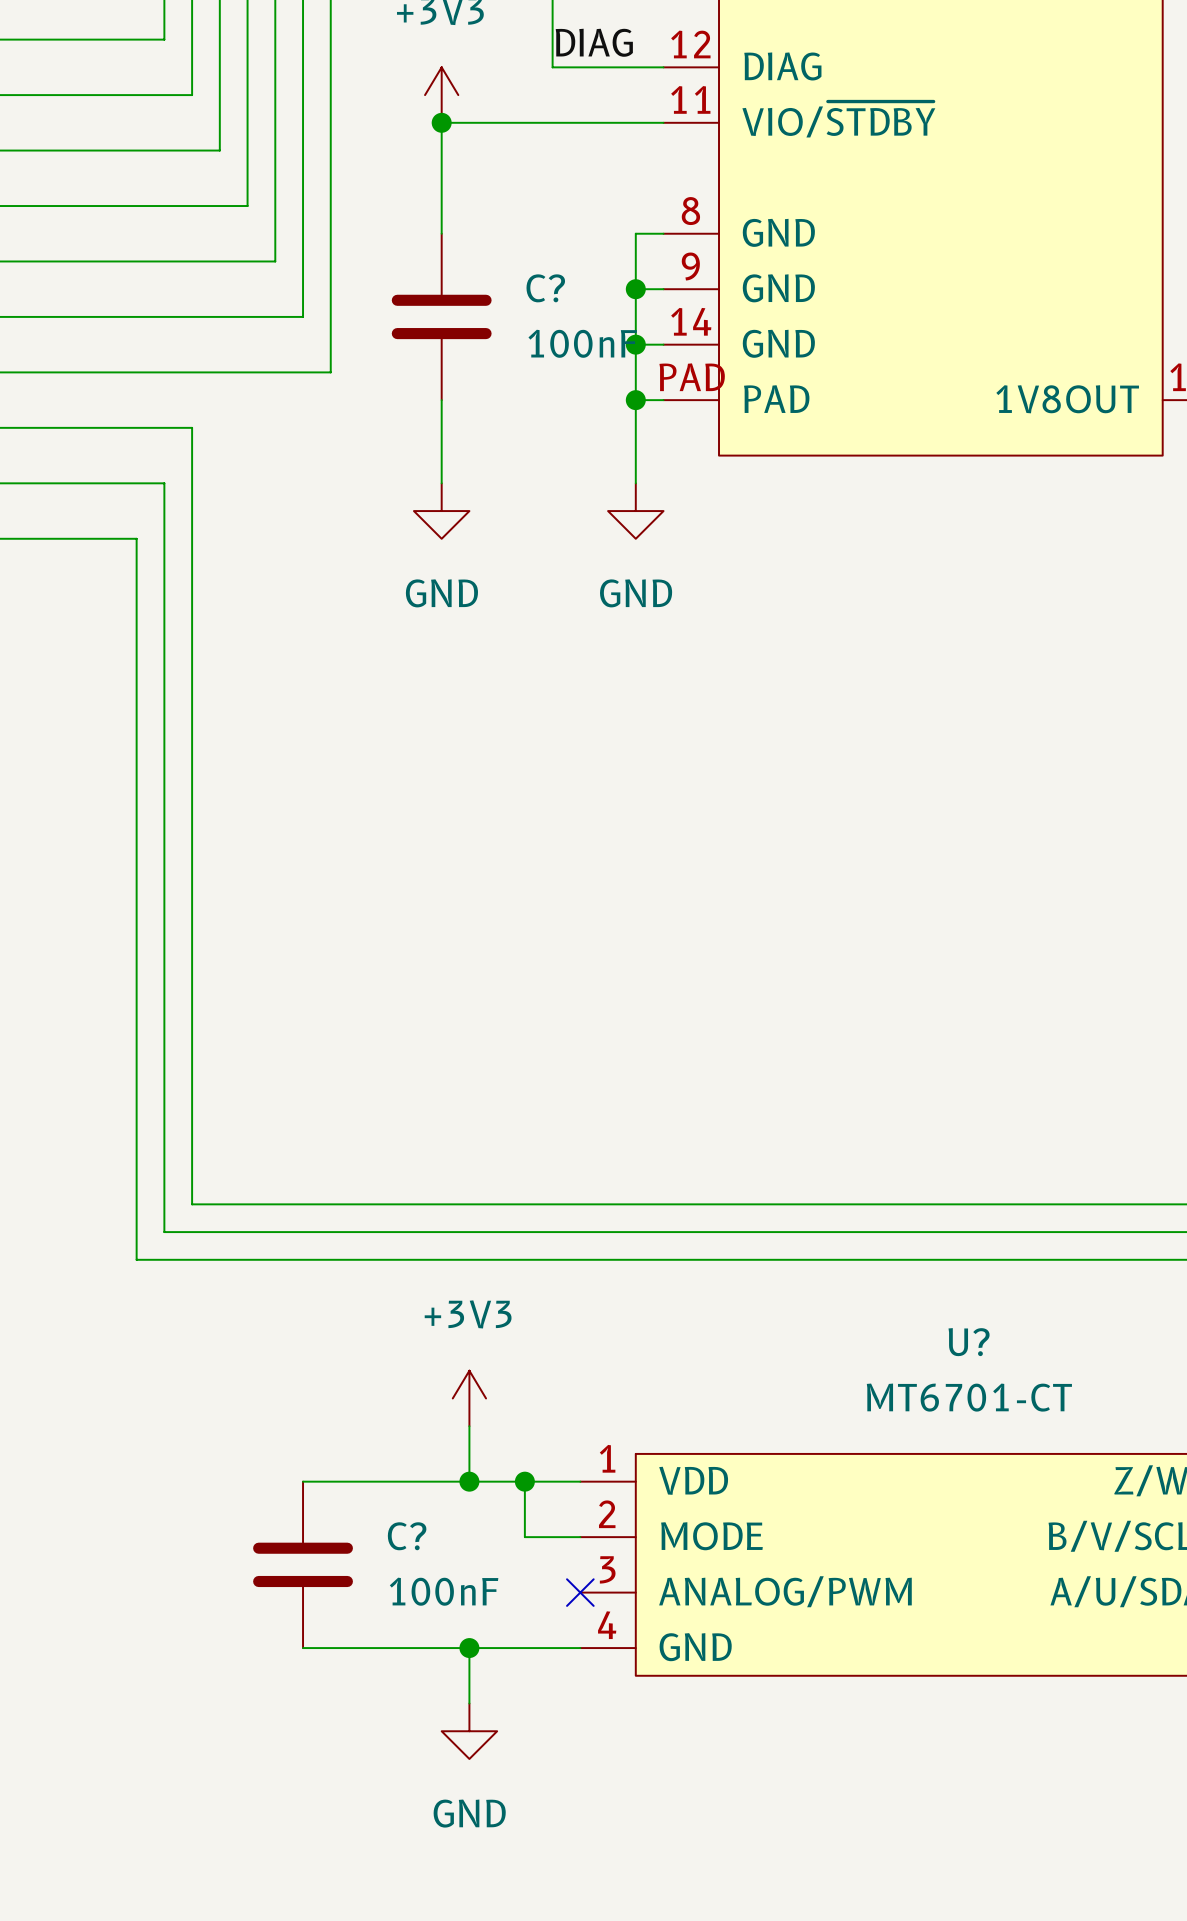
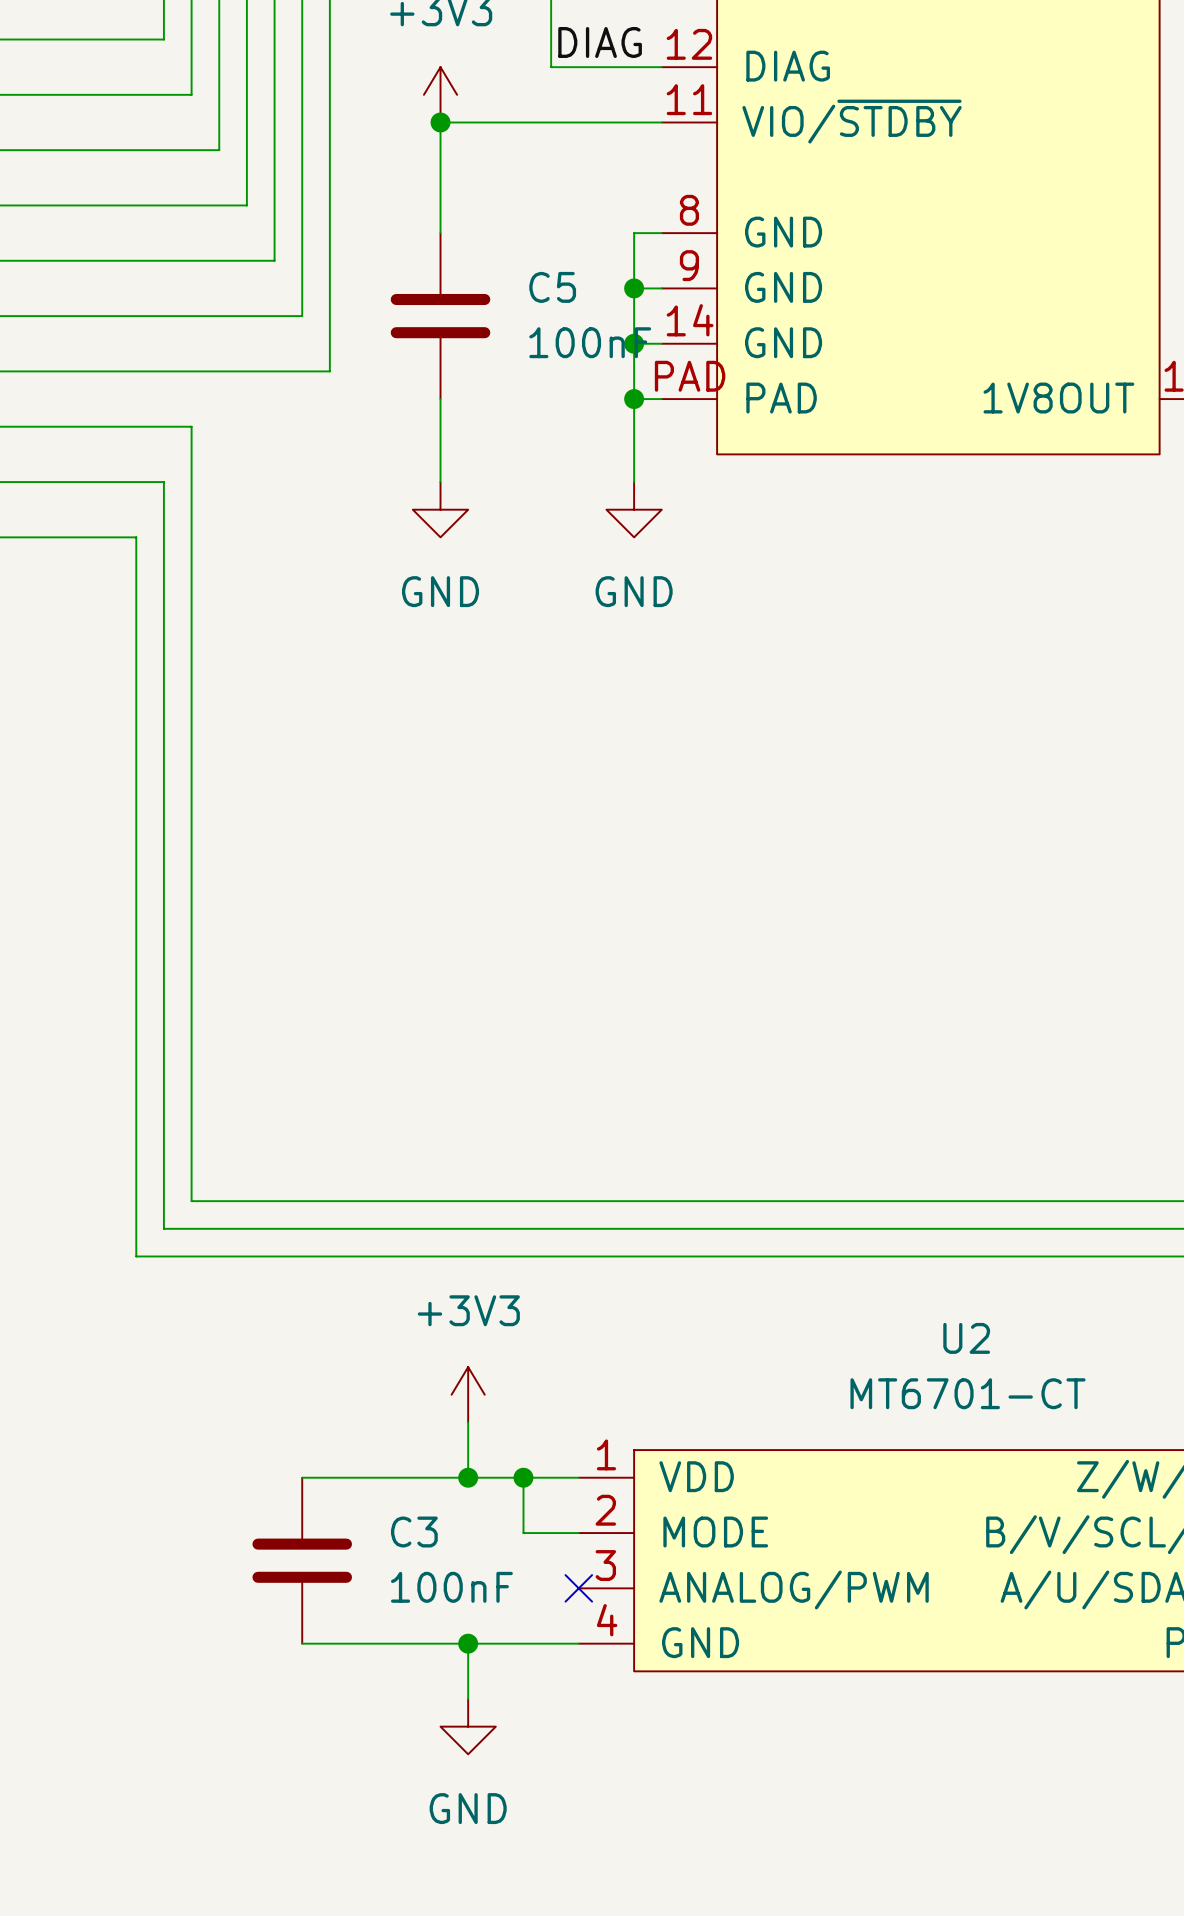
C? name: C? (545, 288) -> C5 (552, 287)
U? name: U? (969, 1342) -> U2 (966, 1338)
C? name: C? (407, 1536) -> C3 (414, 1532)

